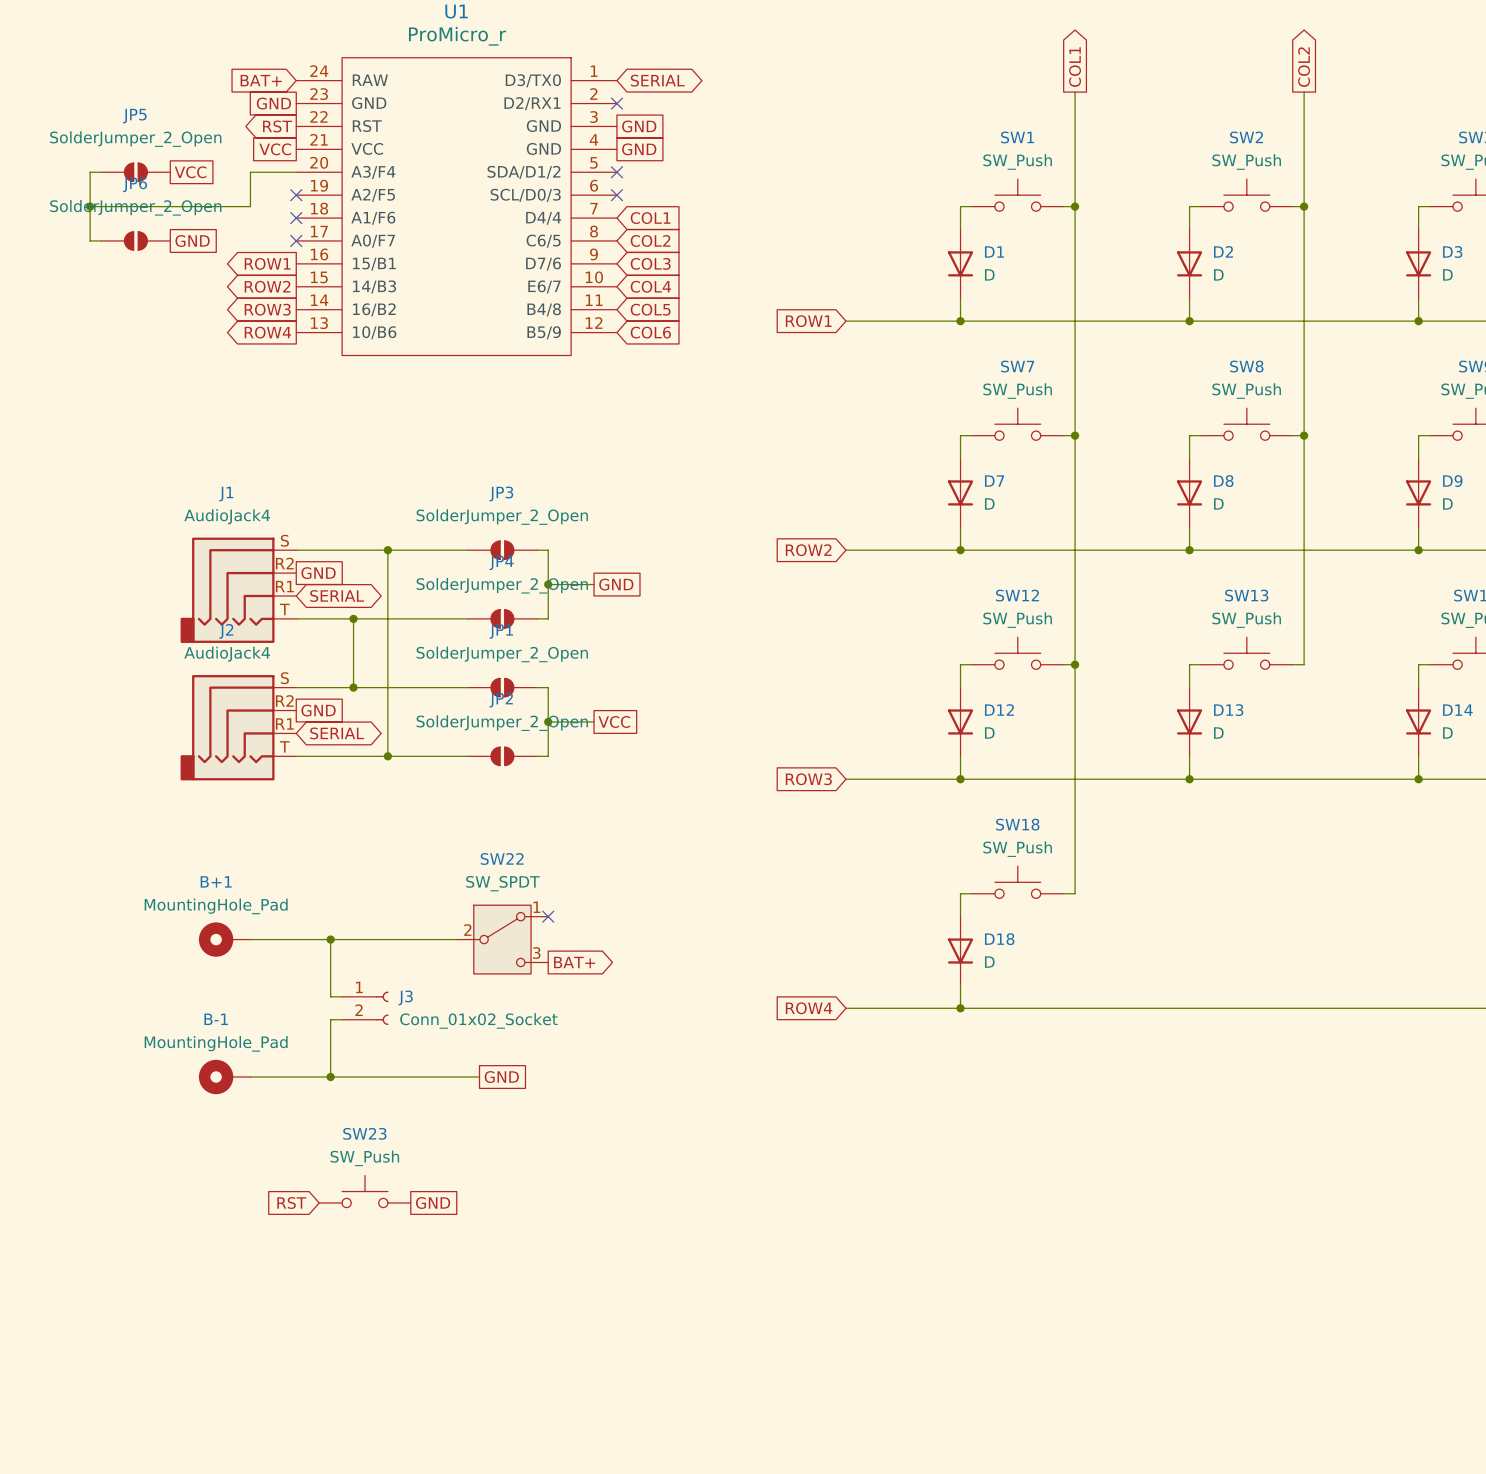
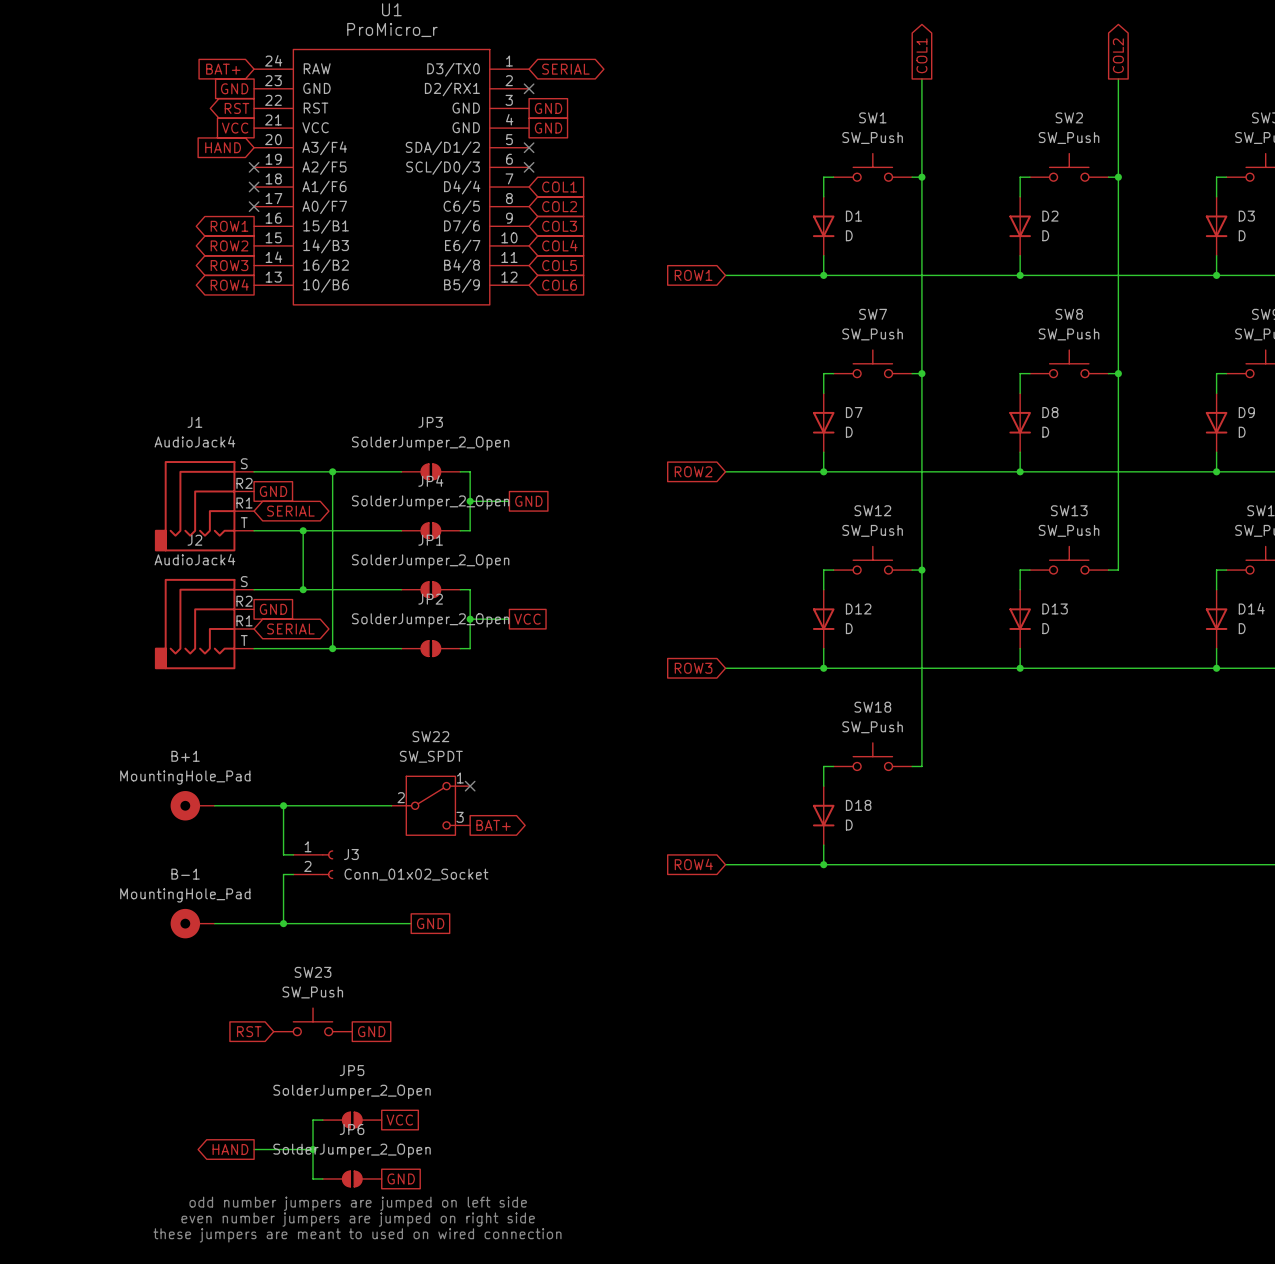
wire: (101, 172) (90, 172) (90, 240) (101, 240) -> none
JP5 position: (135, 172) -> (352, 1120)
global label: VCC (190, 172) -> none
global label: none -> HAND (223, 147)
wire: (296, 172) (250, 172) (250, 206) (90, 206) -> none
junction: (90, 206) -> none
JP6 position: (135, 240) -> (352, 1178)
global label: GND (192, 240) -> none
wire: none -> (322, 1120) (313, 1120) (313, 1178) (322, 1178)
global label: none -> VCC (399, 1120)
global label: none -> HAND (230, 1149)
wire: none -> (254, 1149) (313, 1149)
junction: none -> (313, 1149)
global label: none -> GND (401, 1178)
text: none -> odd number jumpers are jumped on left side (358, 1203)
text: none -> even number jumpers are jumped on right side (358, 1219)
text: none -> these jumpers are meant to used on wired connection (357, 1235)

